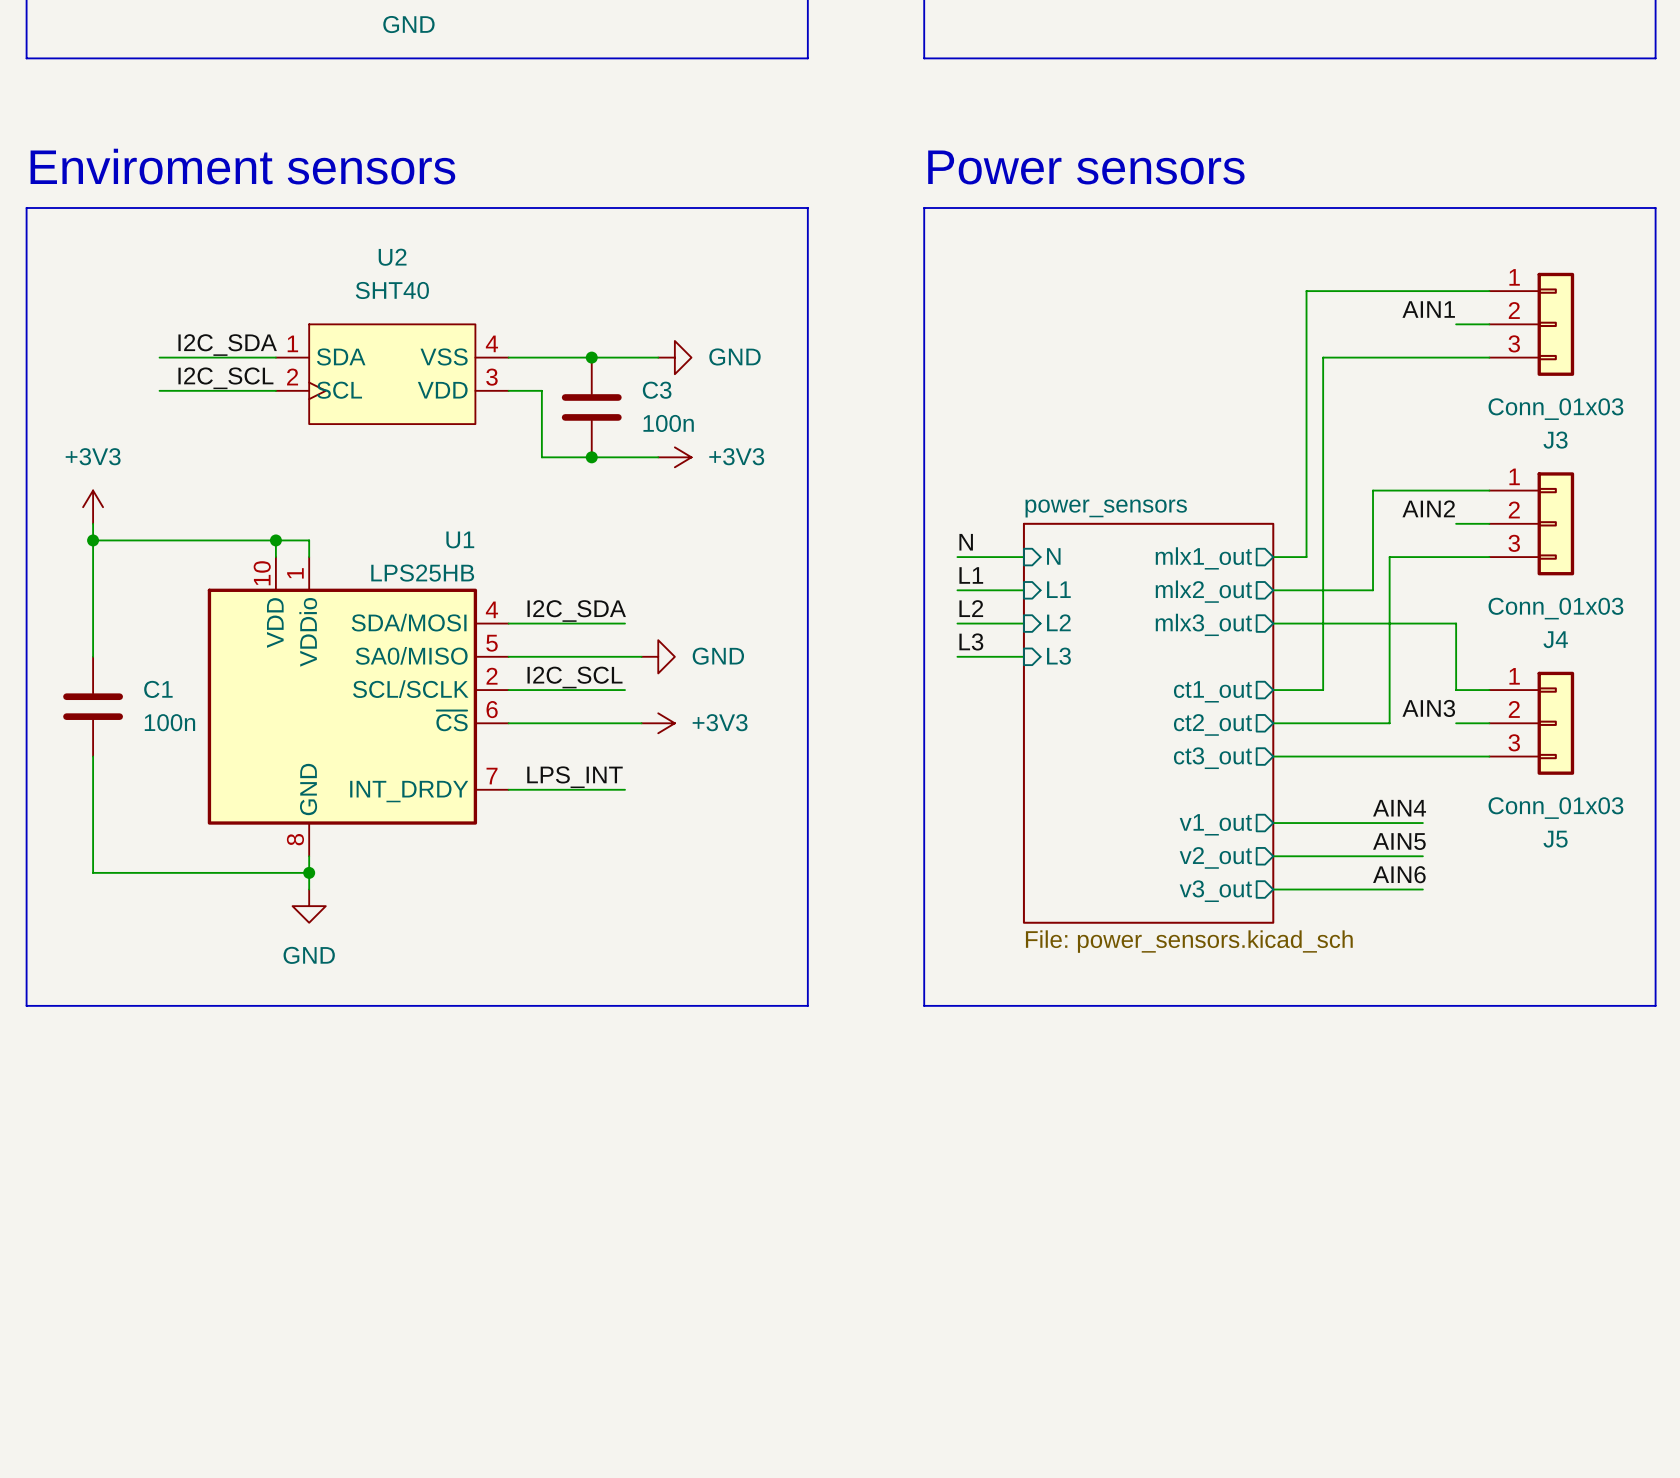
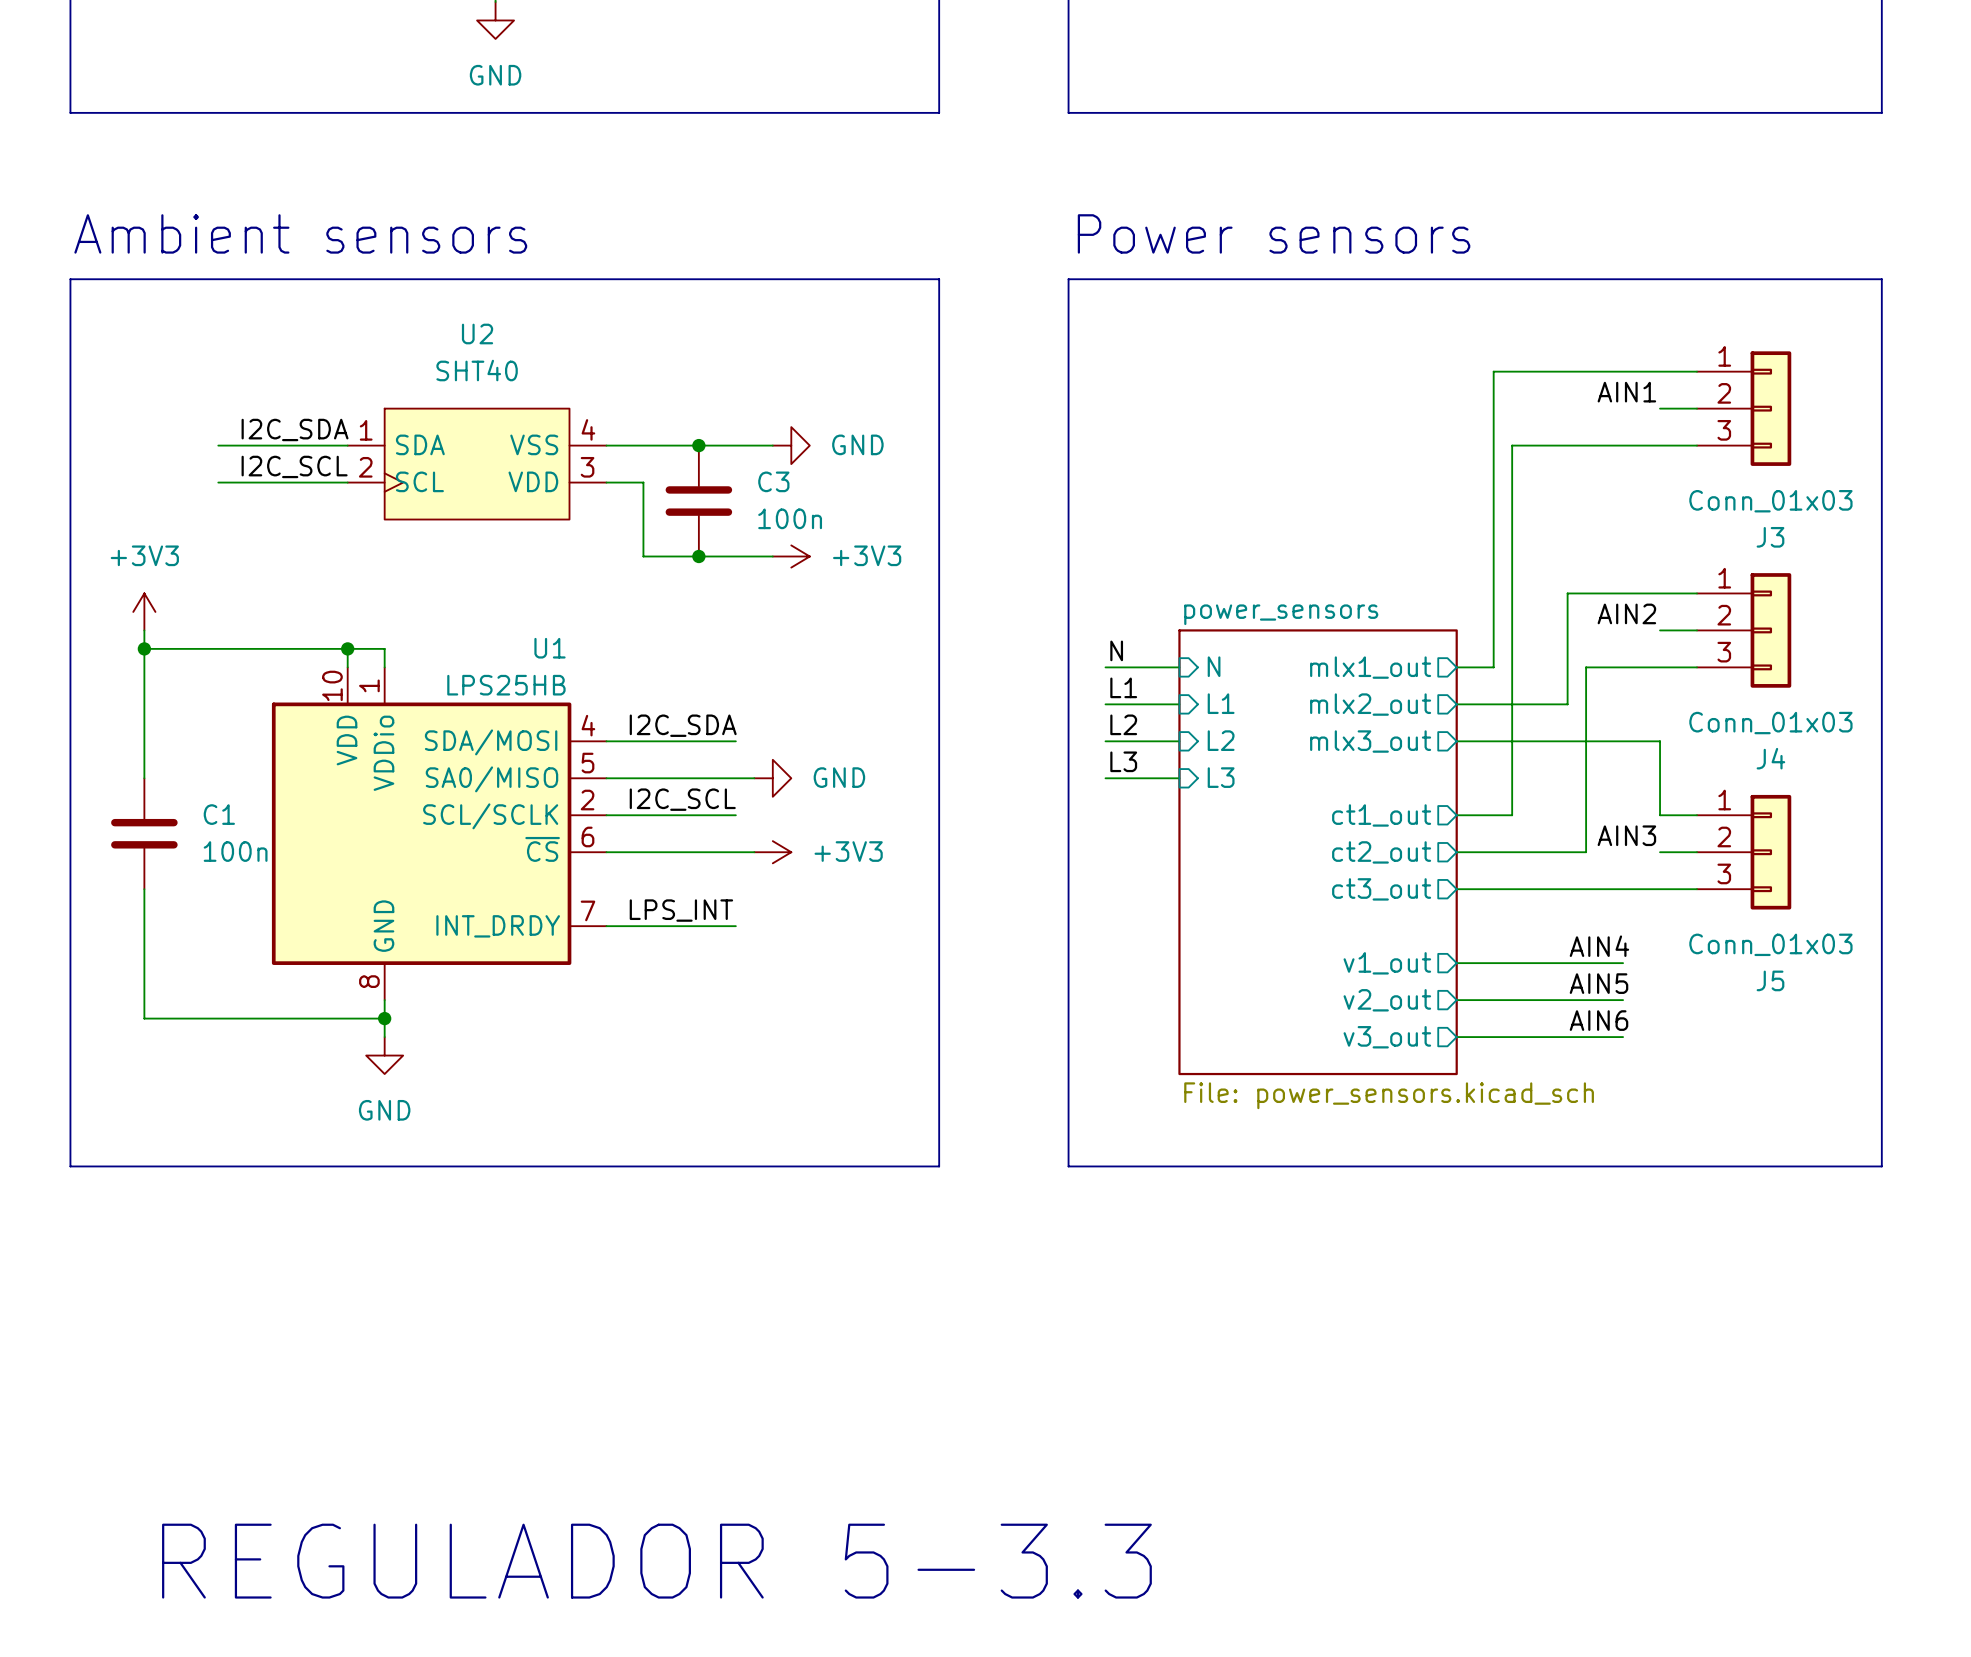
text: Enviroment sensors (242, 166) -> Ambient sensors (300, 233)
text: none -> REGULADOR 5-3.3 (656, 1561)

